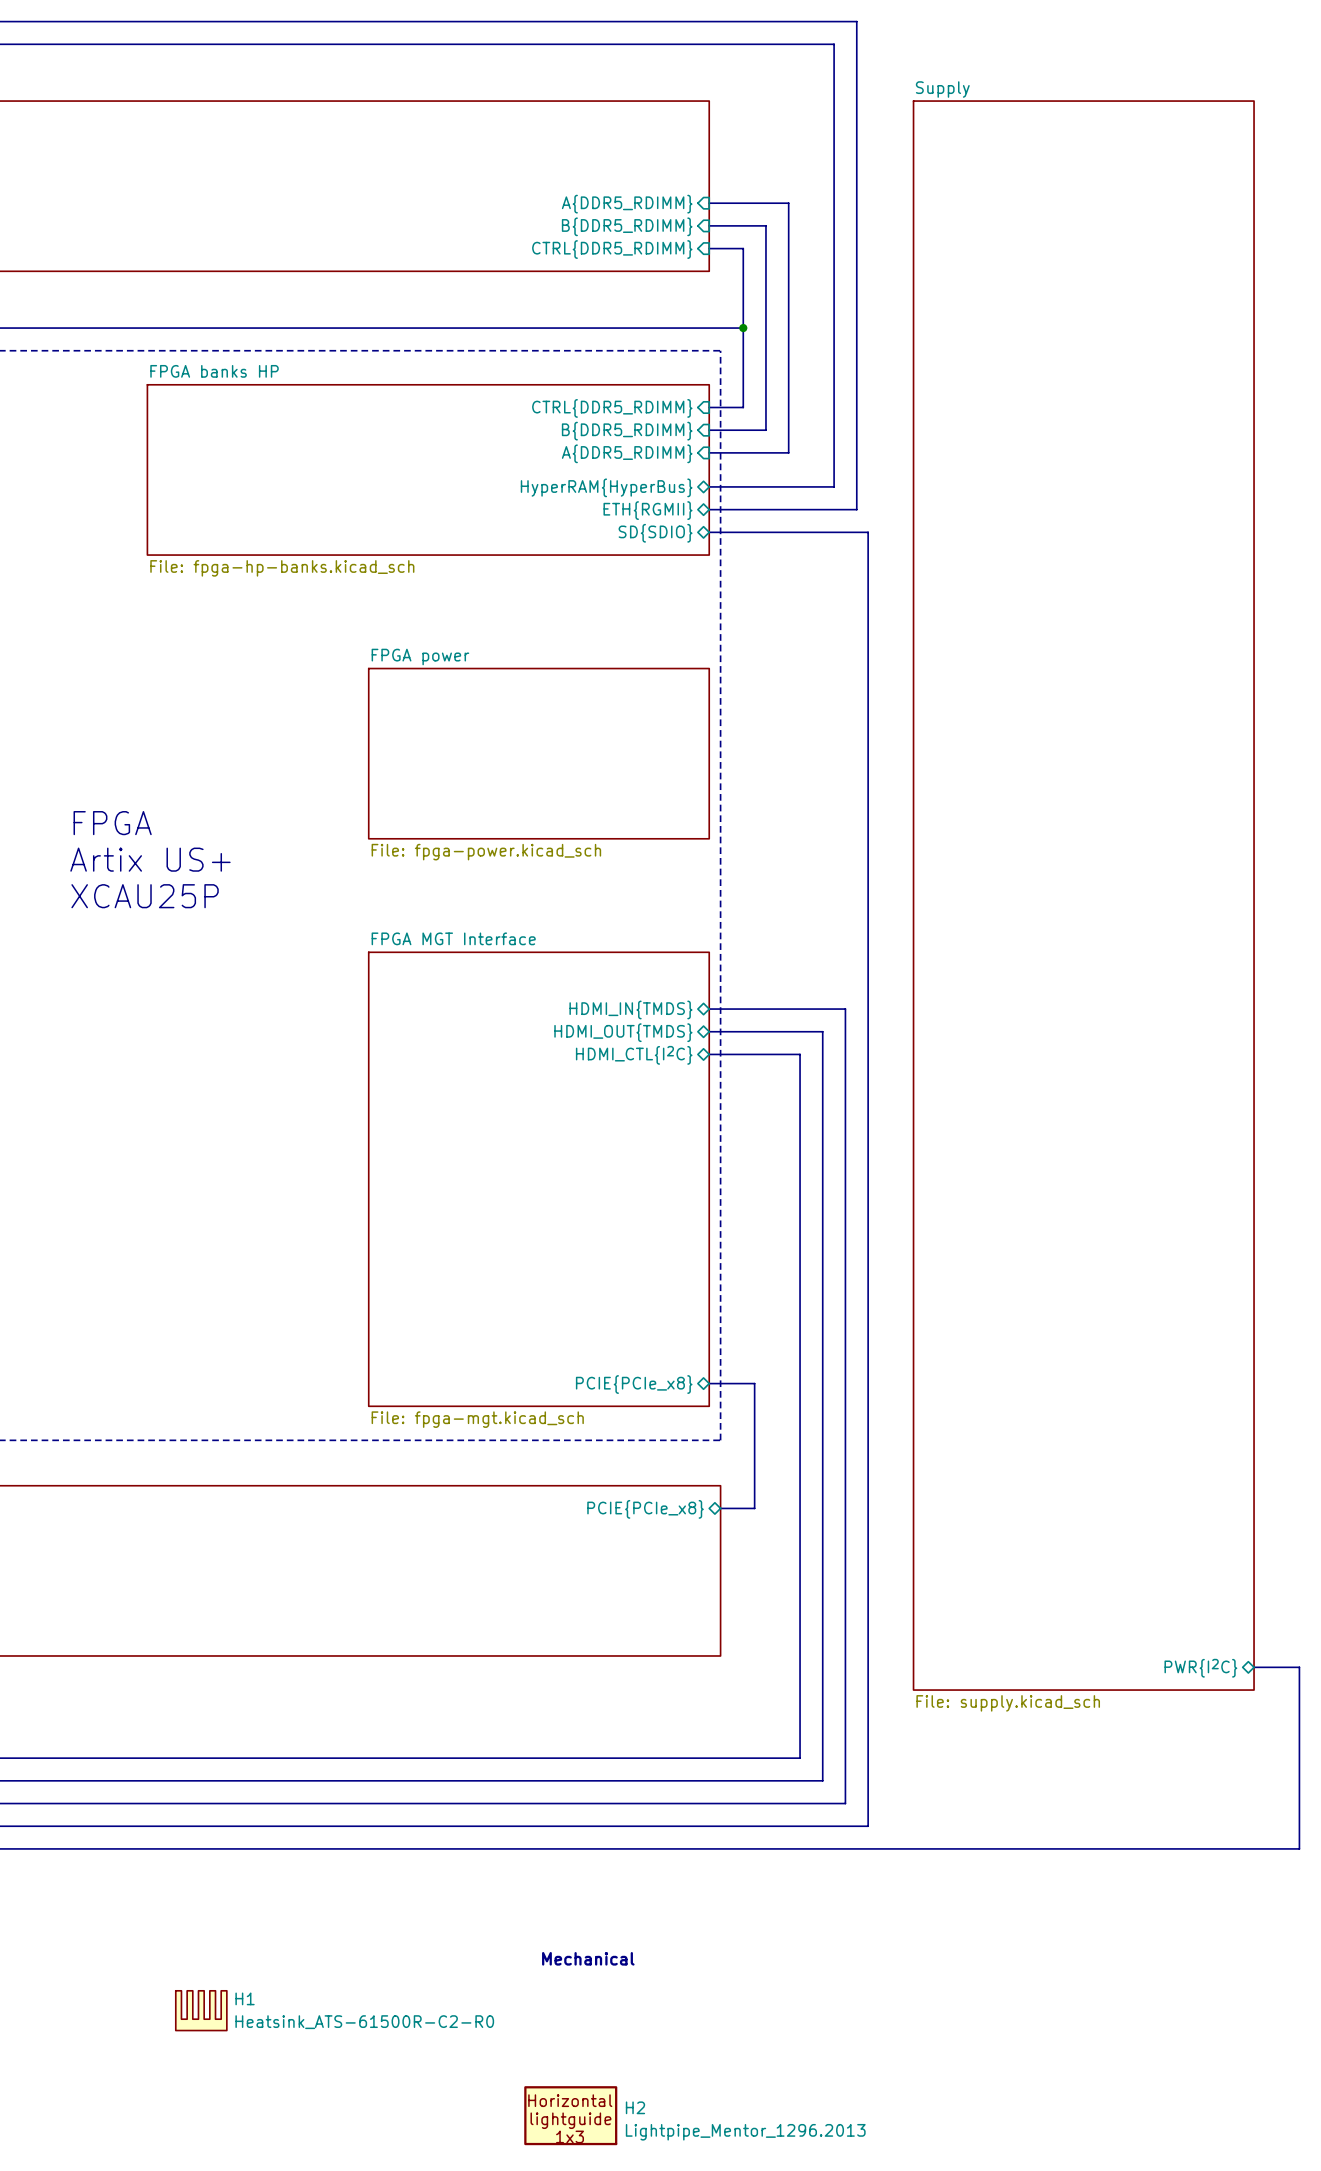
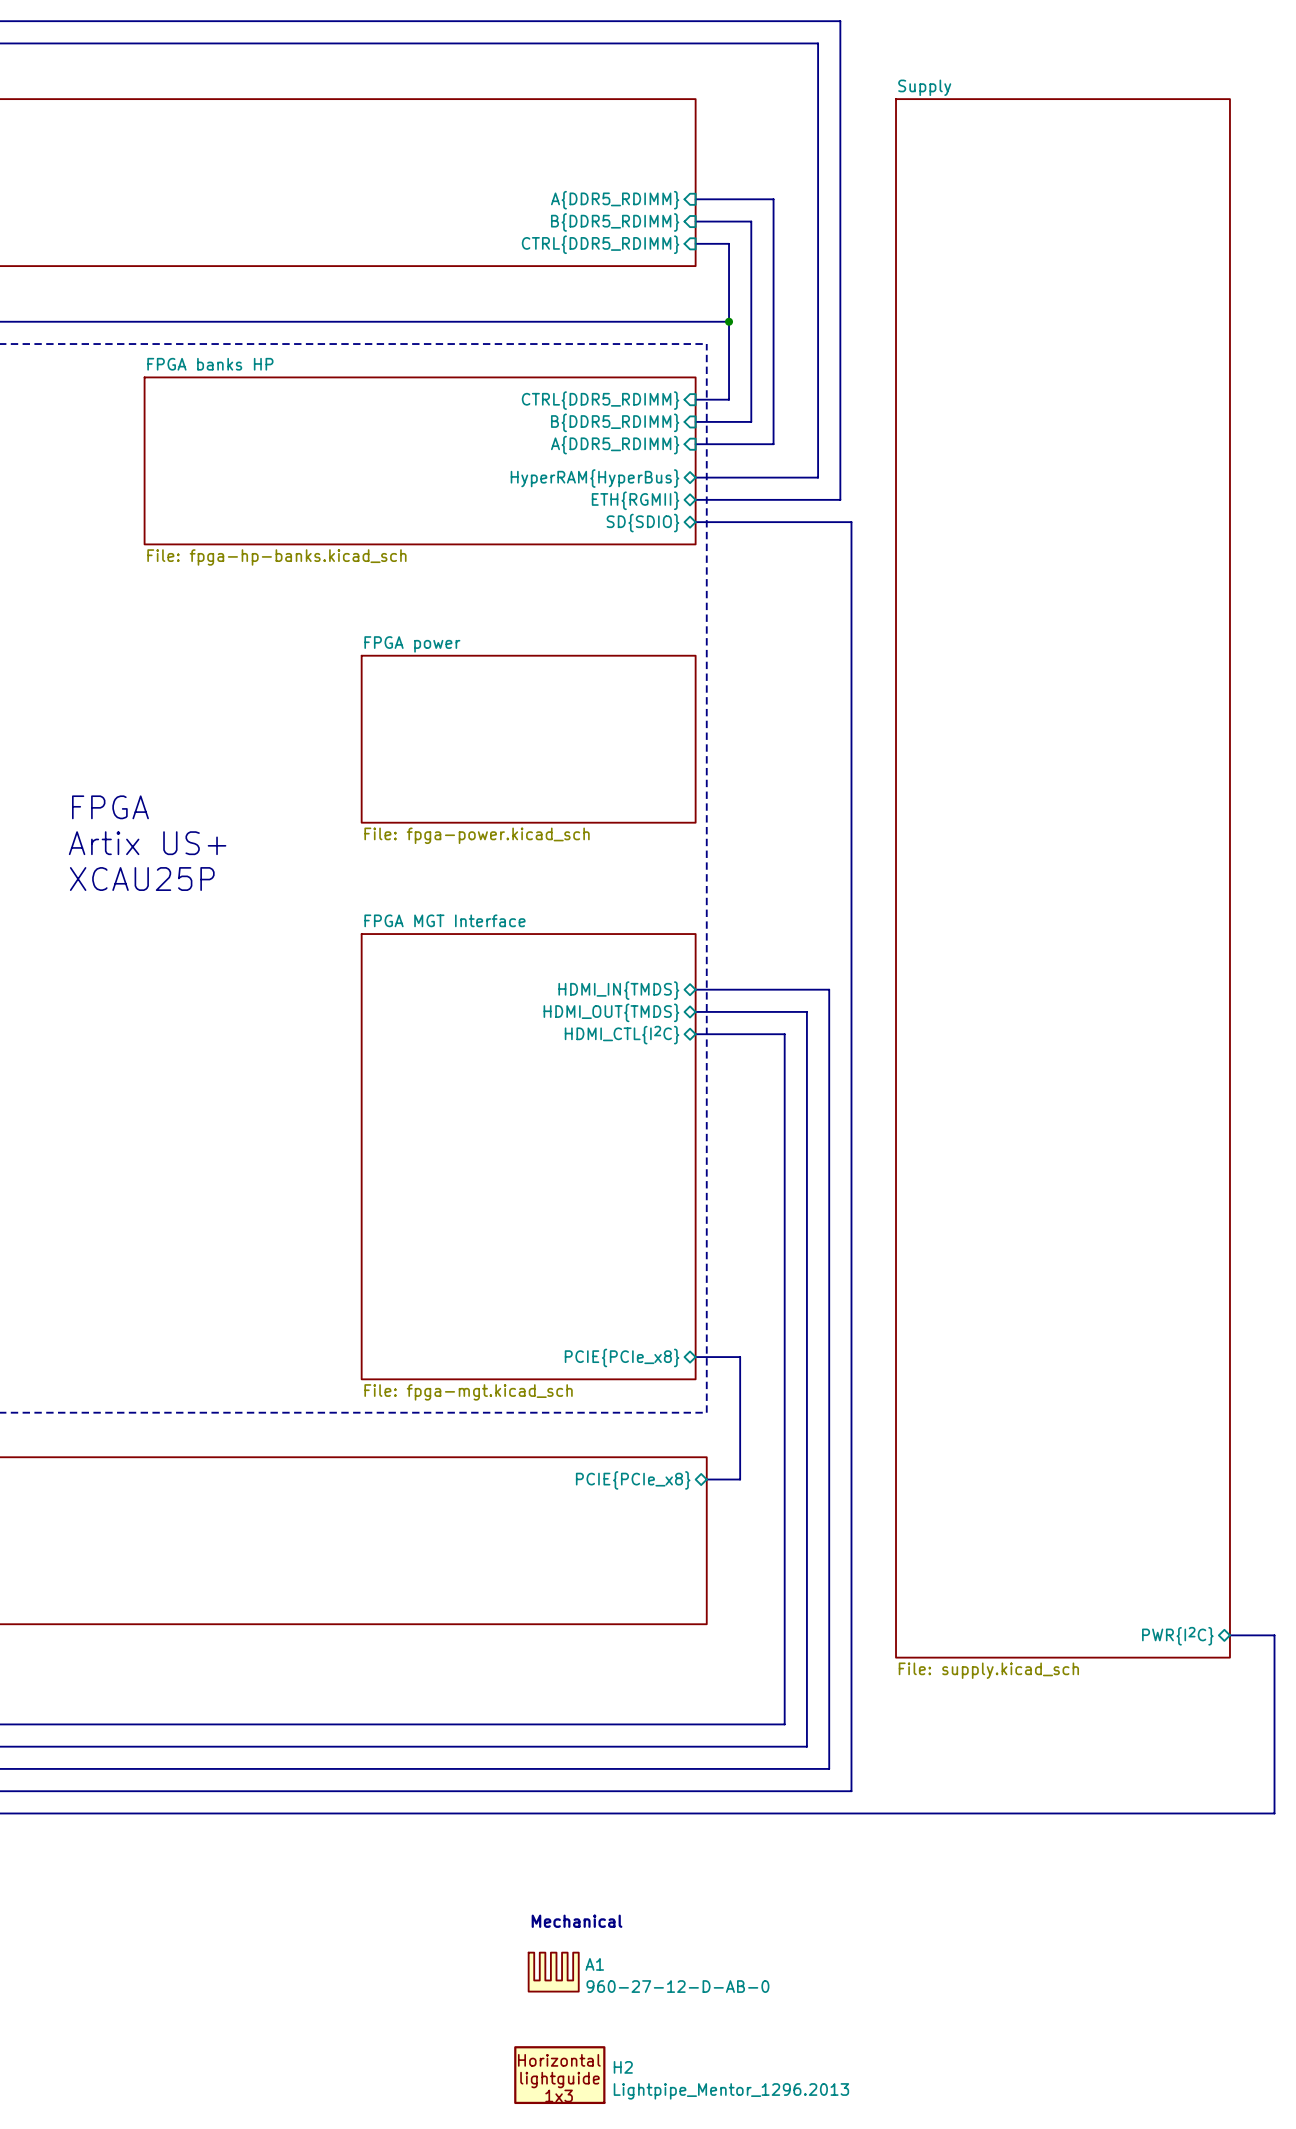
H1: Heatsink_ATS-61500R-C2-R0 (201, 2010) -> none
A1: none -> (553, 1972)

